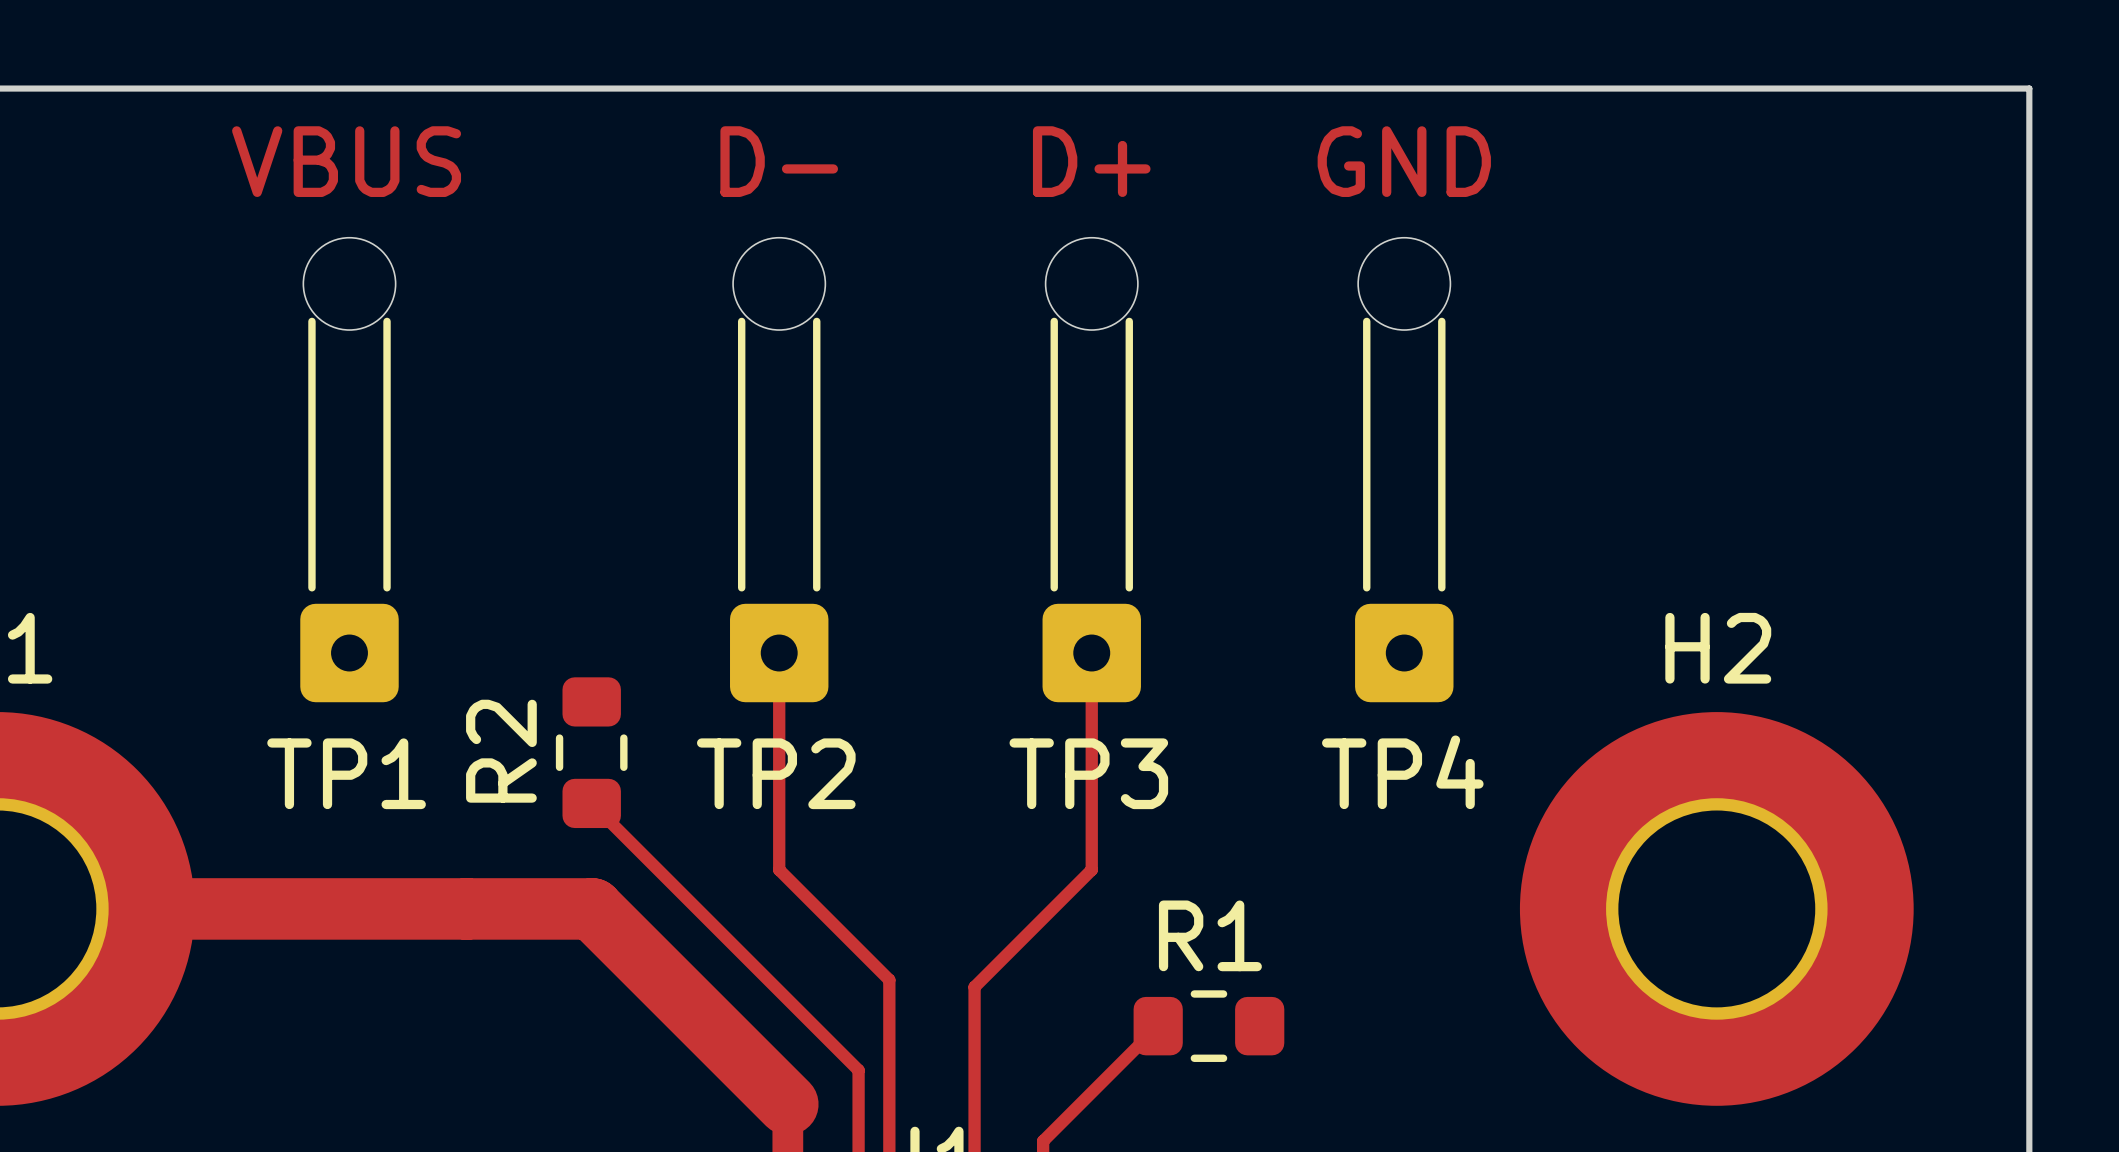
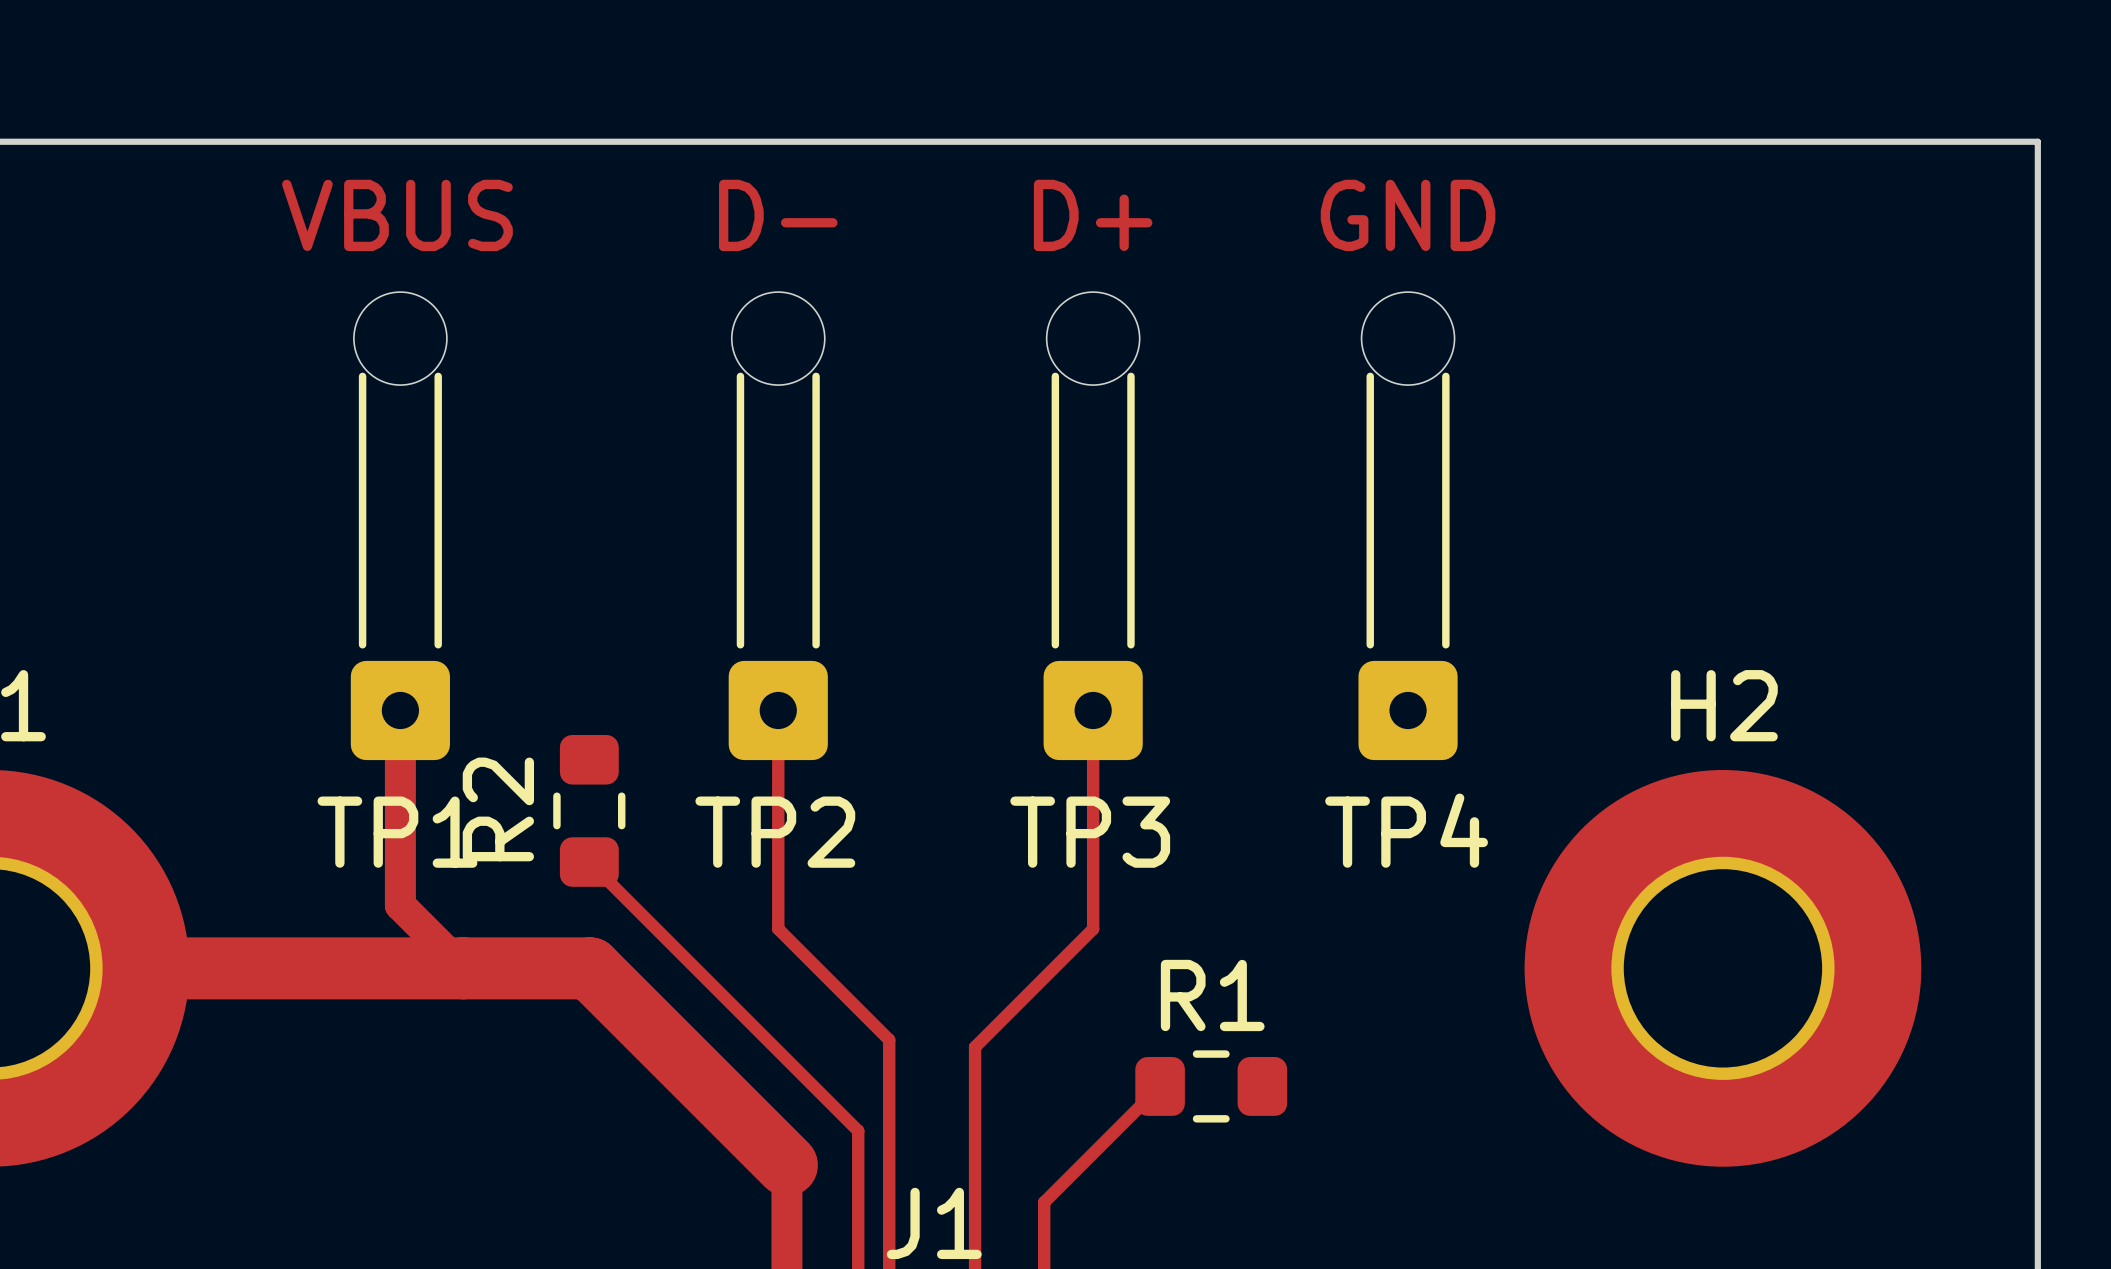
TP1 position: (349, 469) -> (400, 526)
track: none -> (400, 710) (400, 905) (463, 968)

